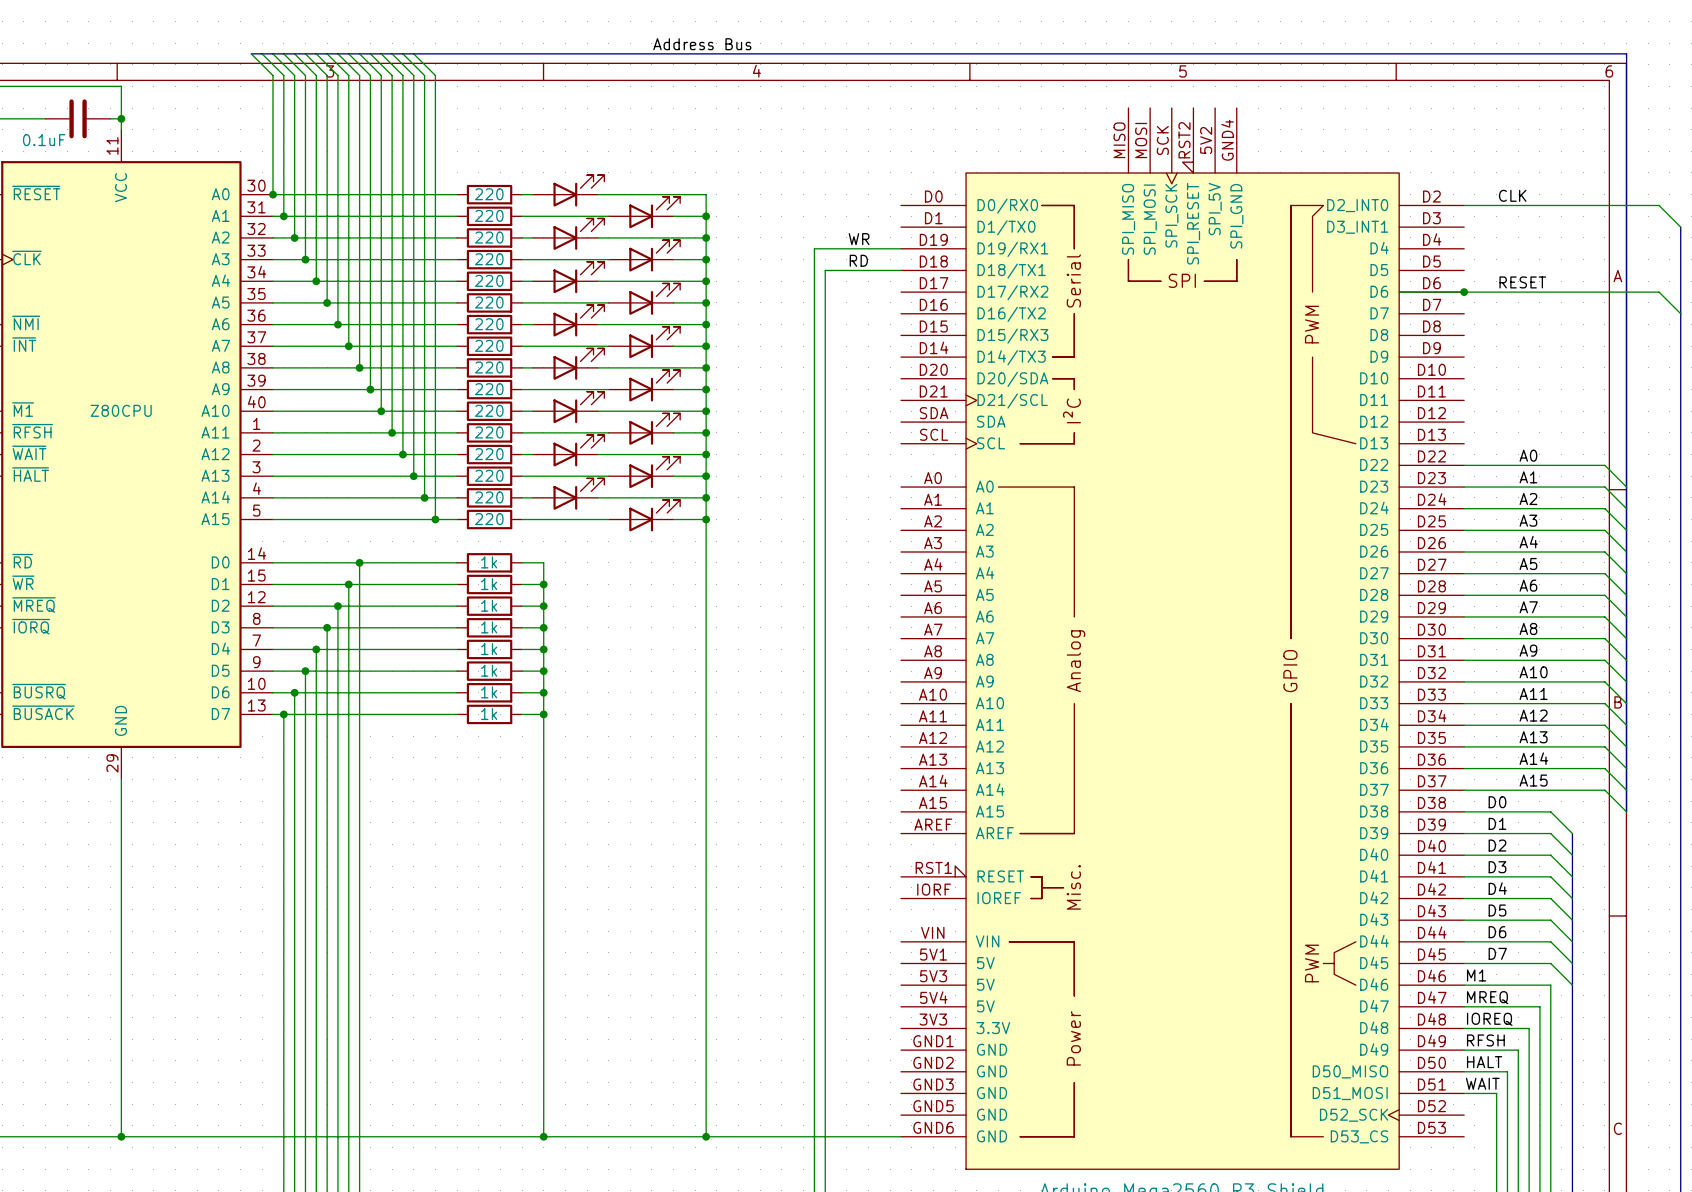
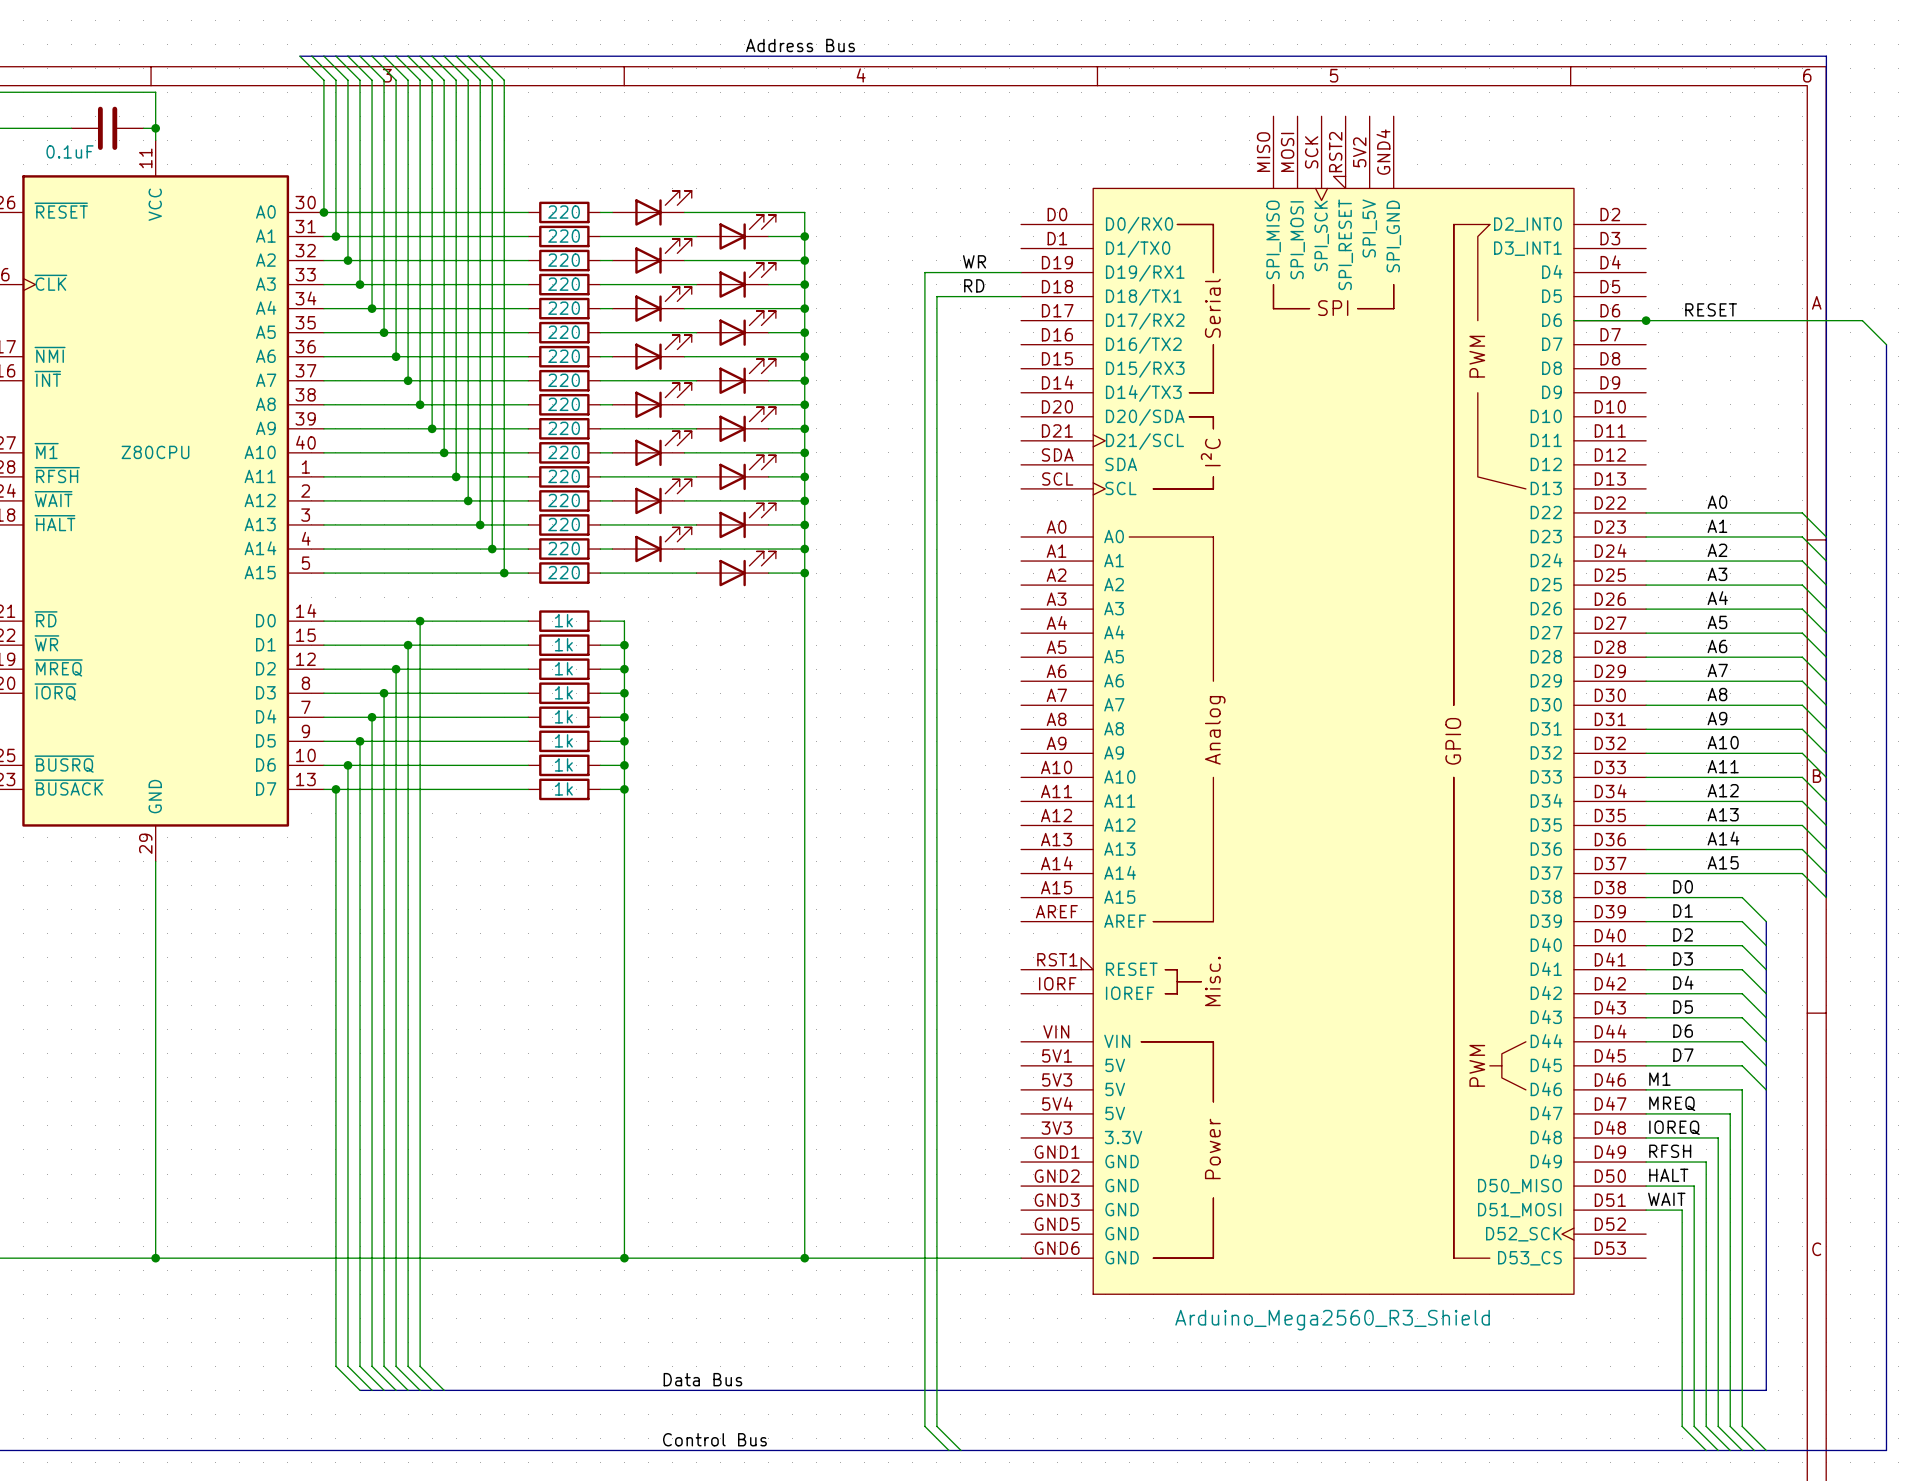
label: CLK (1512, 195) -> none
wire: (1464, 205) (1659, 205) (1680, 227) -> none
bus: (1680, 227) (1680, 313) -> none

